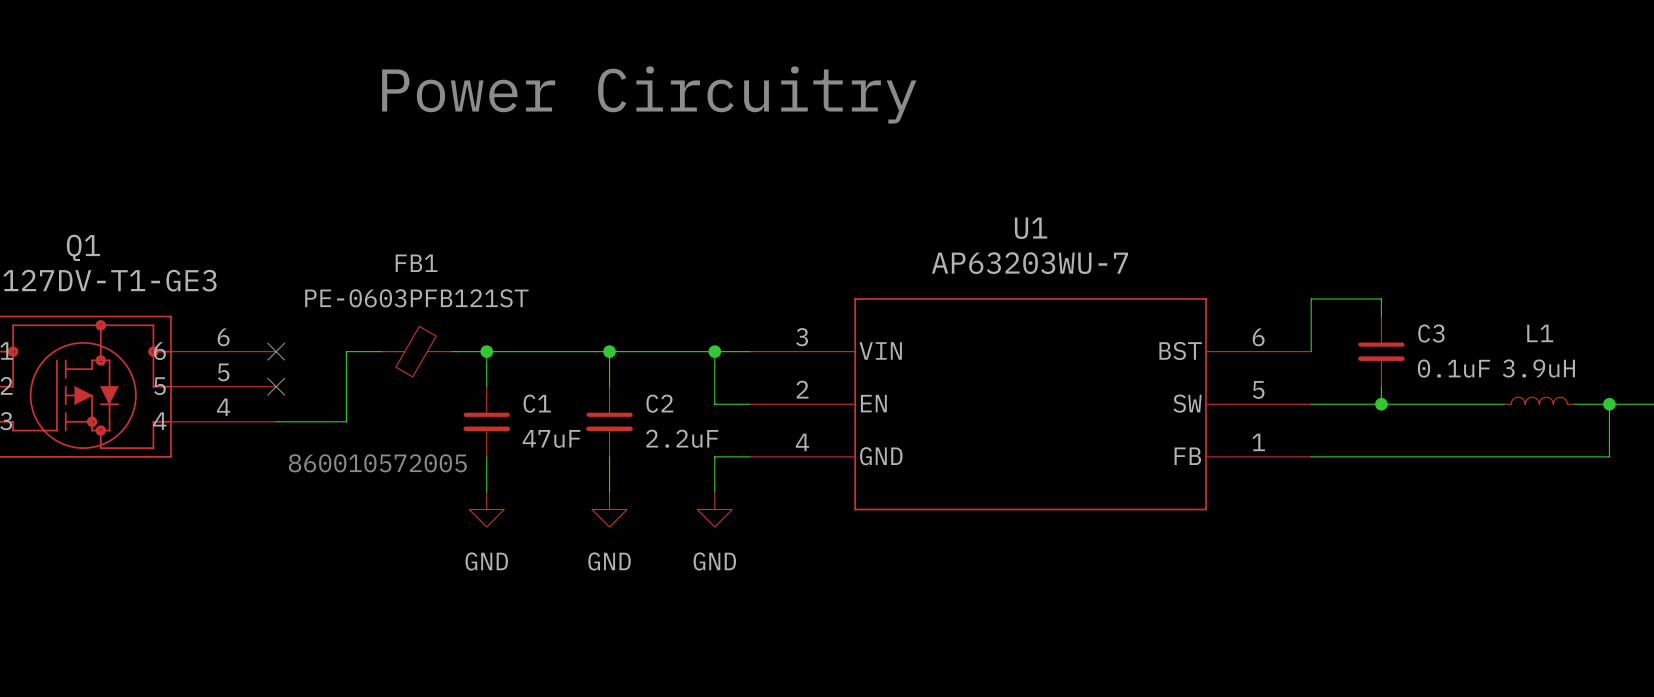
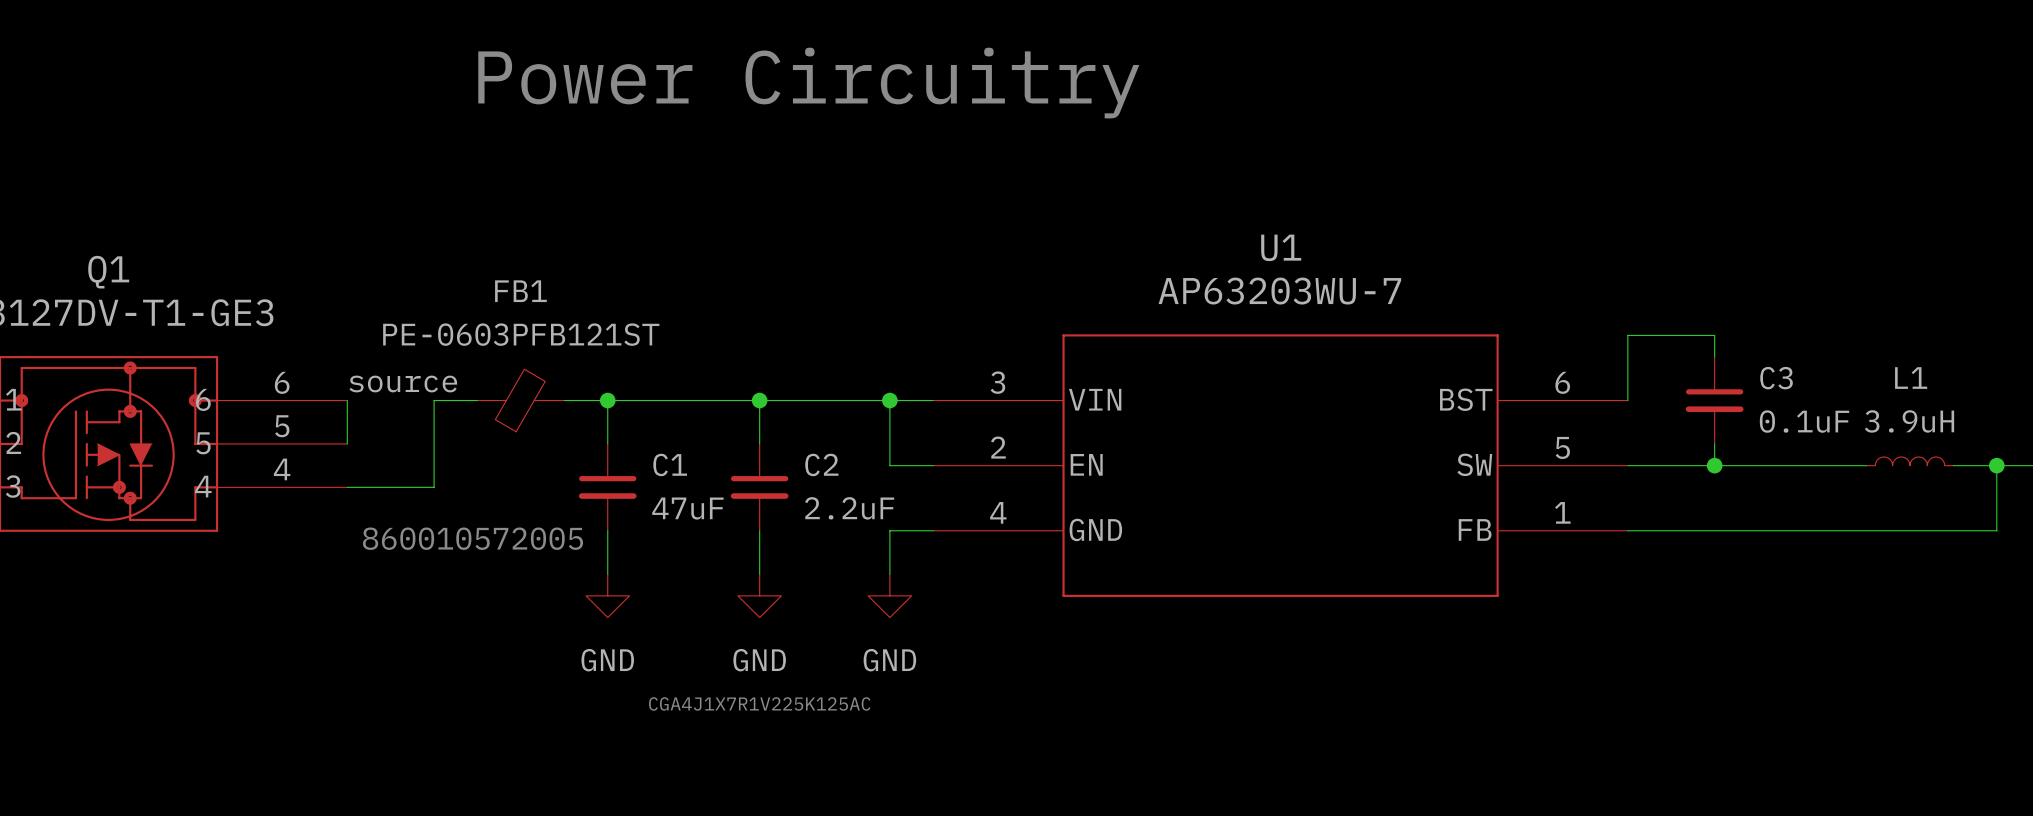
label: none -> source (403, 384)
wire: none -> (347, 400) (347, 443)
no-connect mark: (276, 351) -> none
no-connect mark: (276, 386) -> none
text: none -> CGA4J1X7R1V225K125AC (759, 703)

